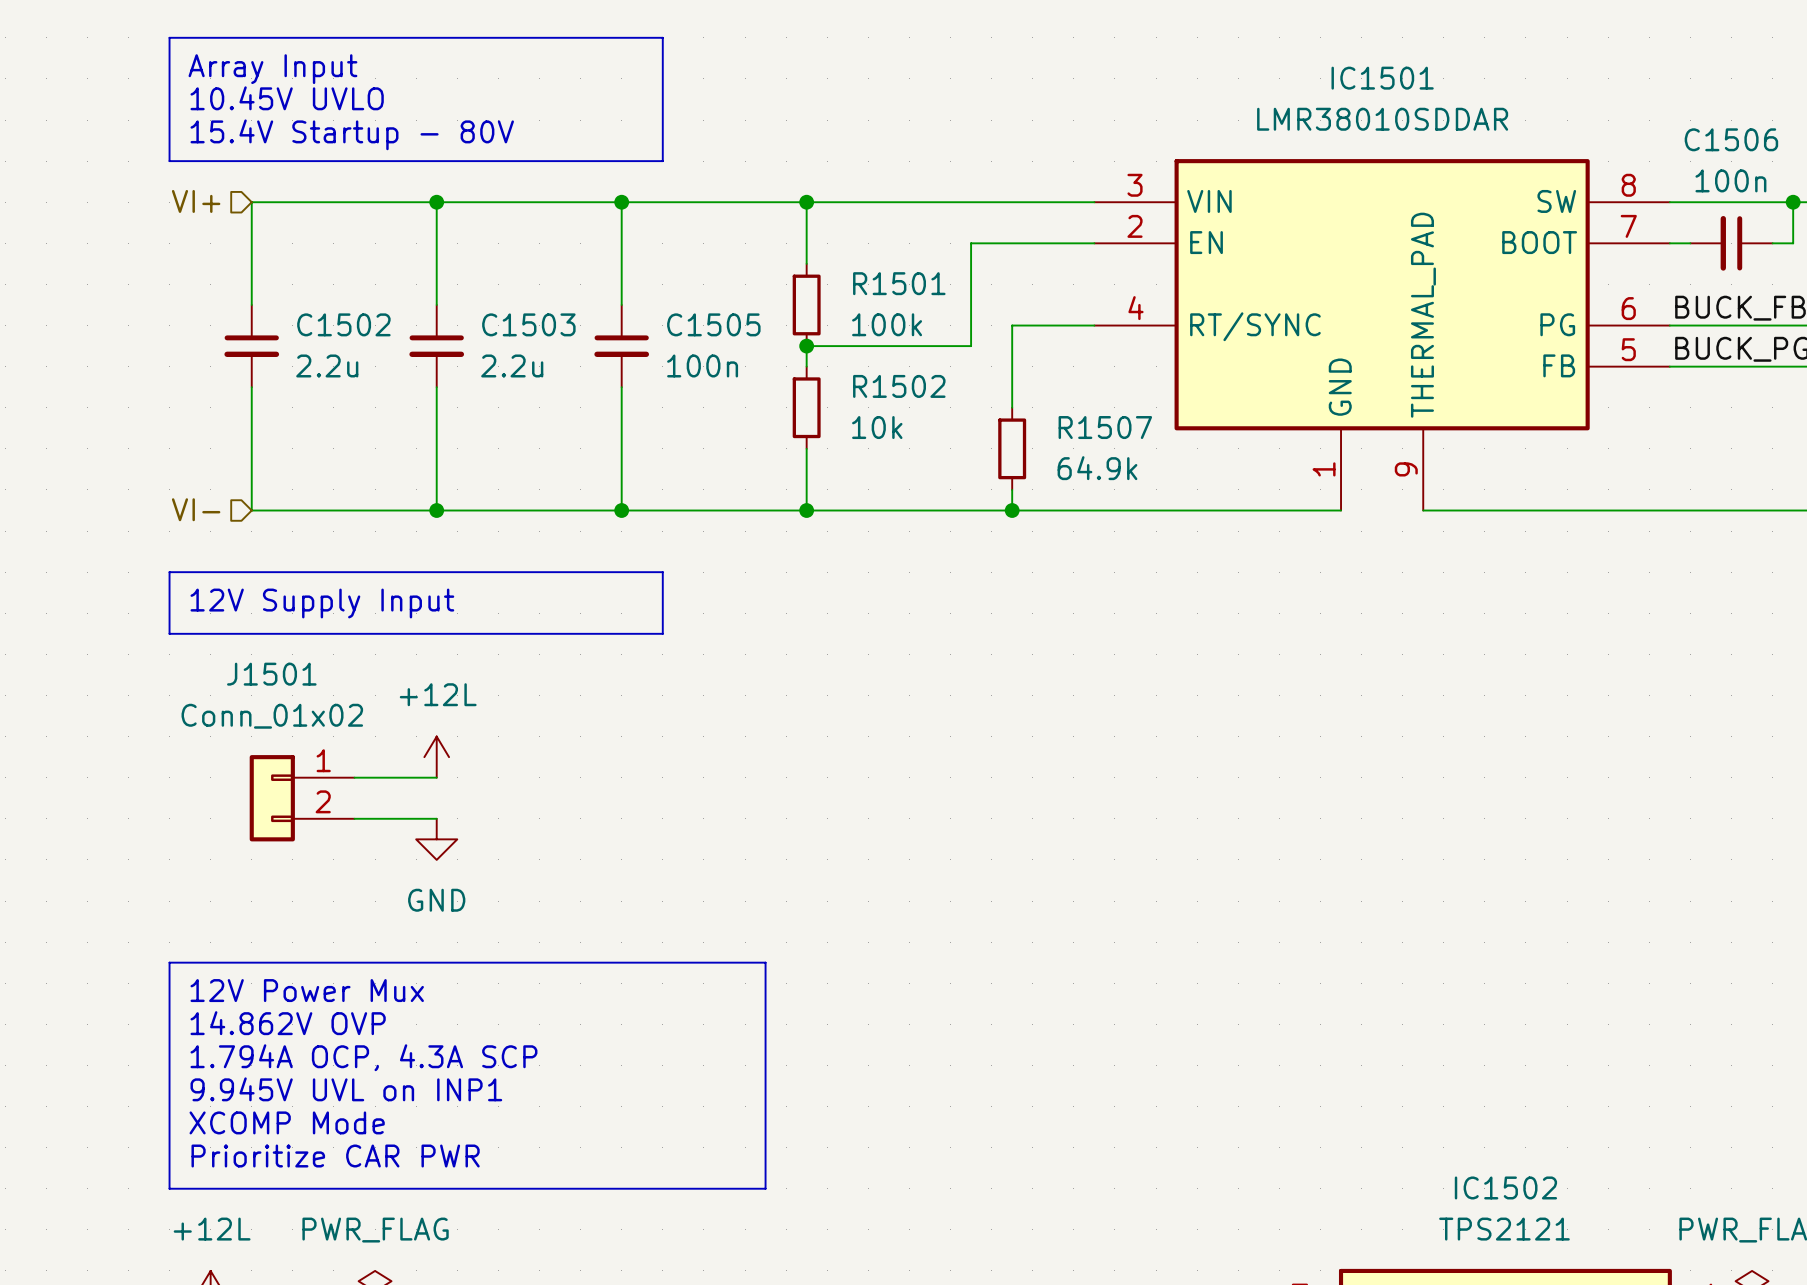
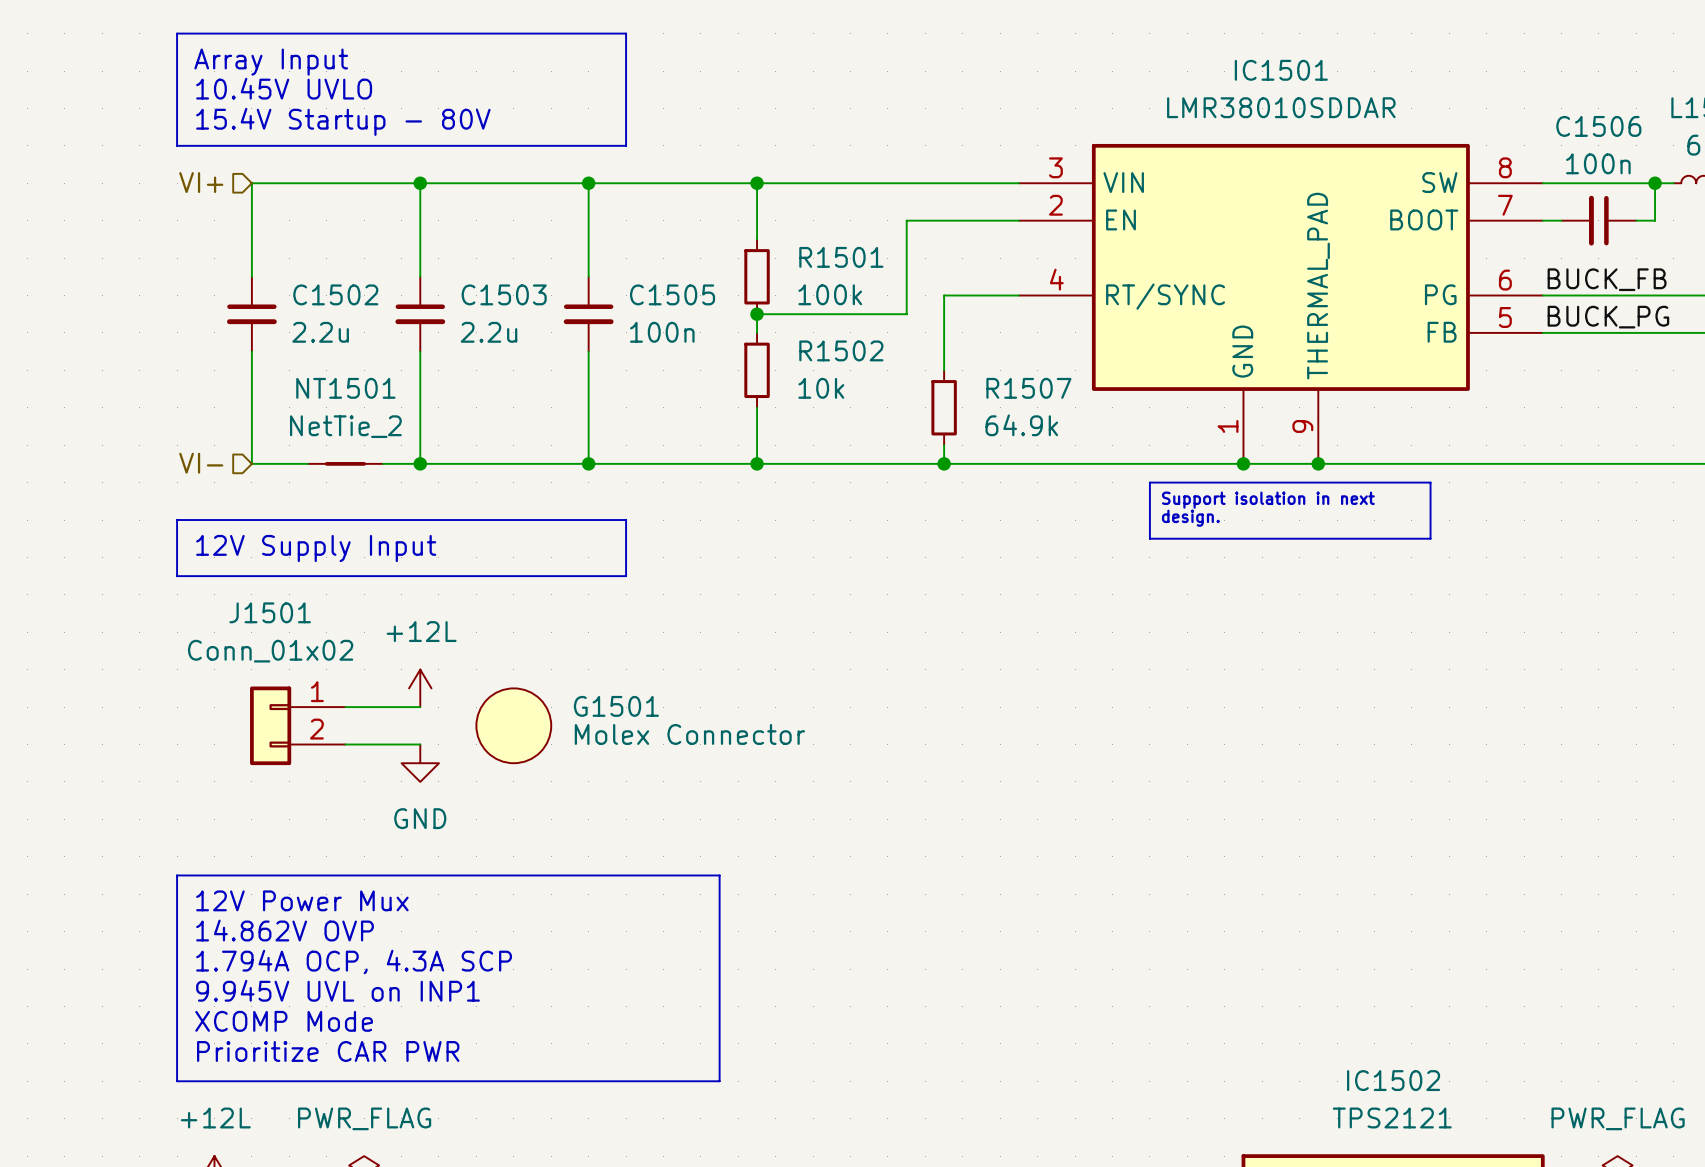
NT1501: none -> NetTie_2 (345, 463)
wire: none -> (1243, 463) (1318, 463)
junction: none -> (1243, 463)
junction: none -> (1318, 463)
line: none -> (1149, 482) (1430, 482) (1430, 538) (1149, 538) (1149, 482)
text: none -> Support isolation in next (1268, 500)
text: none -> design. (1190, 518)
G1501: none -> Molex Connector (513, 725)

